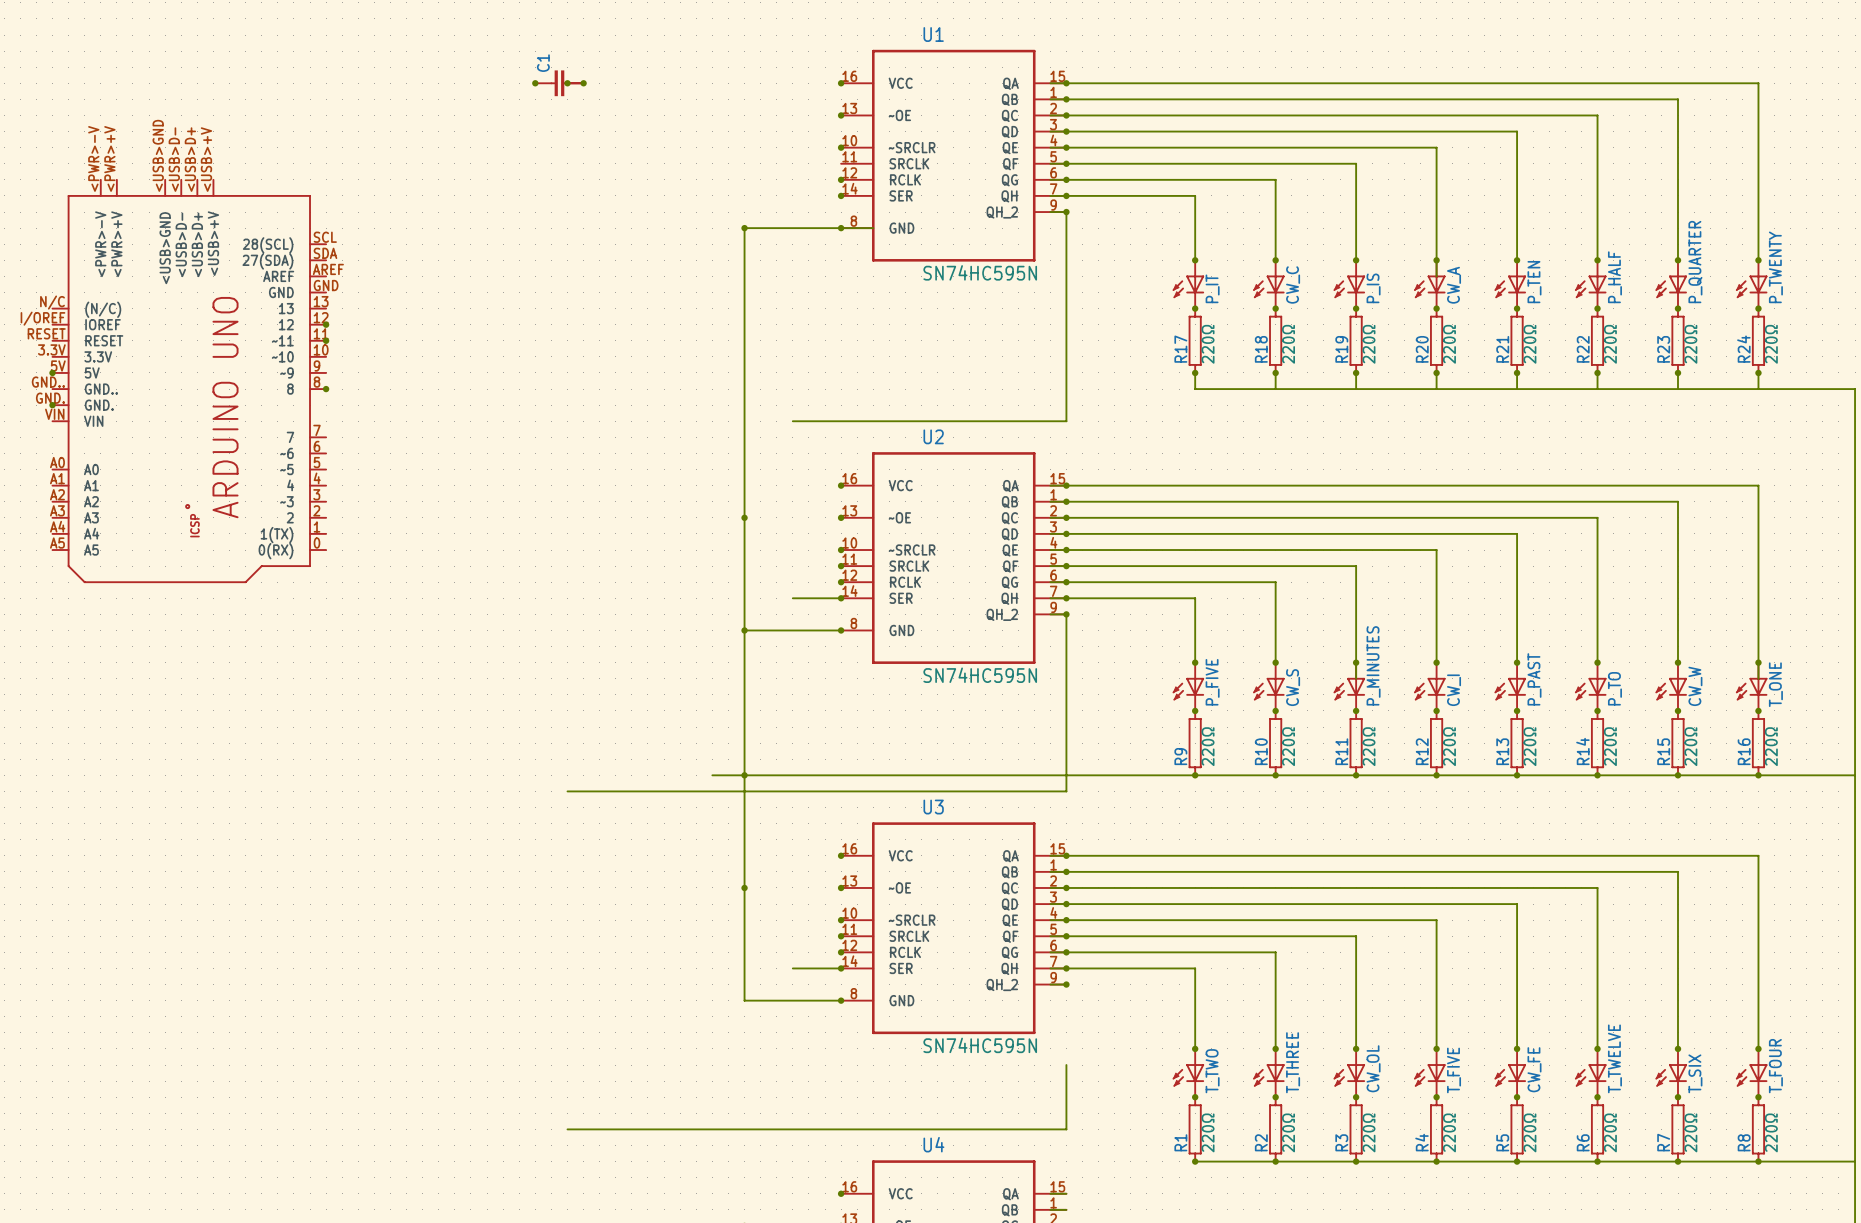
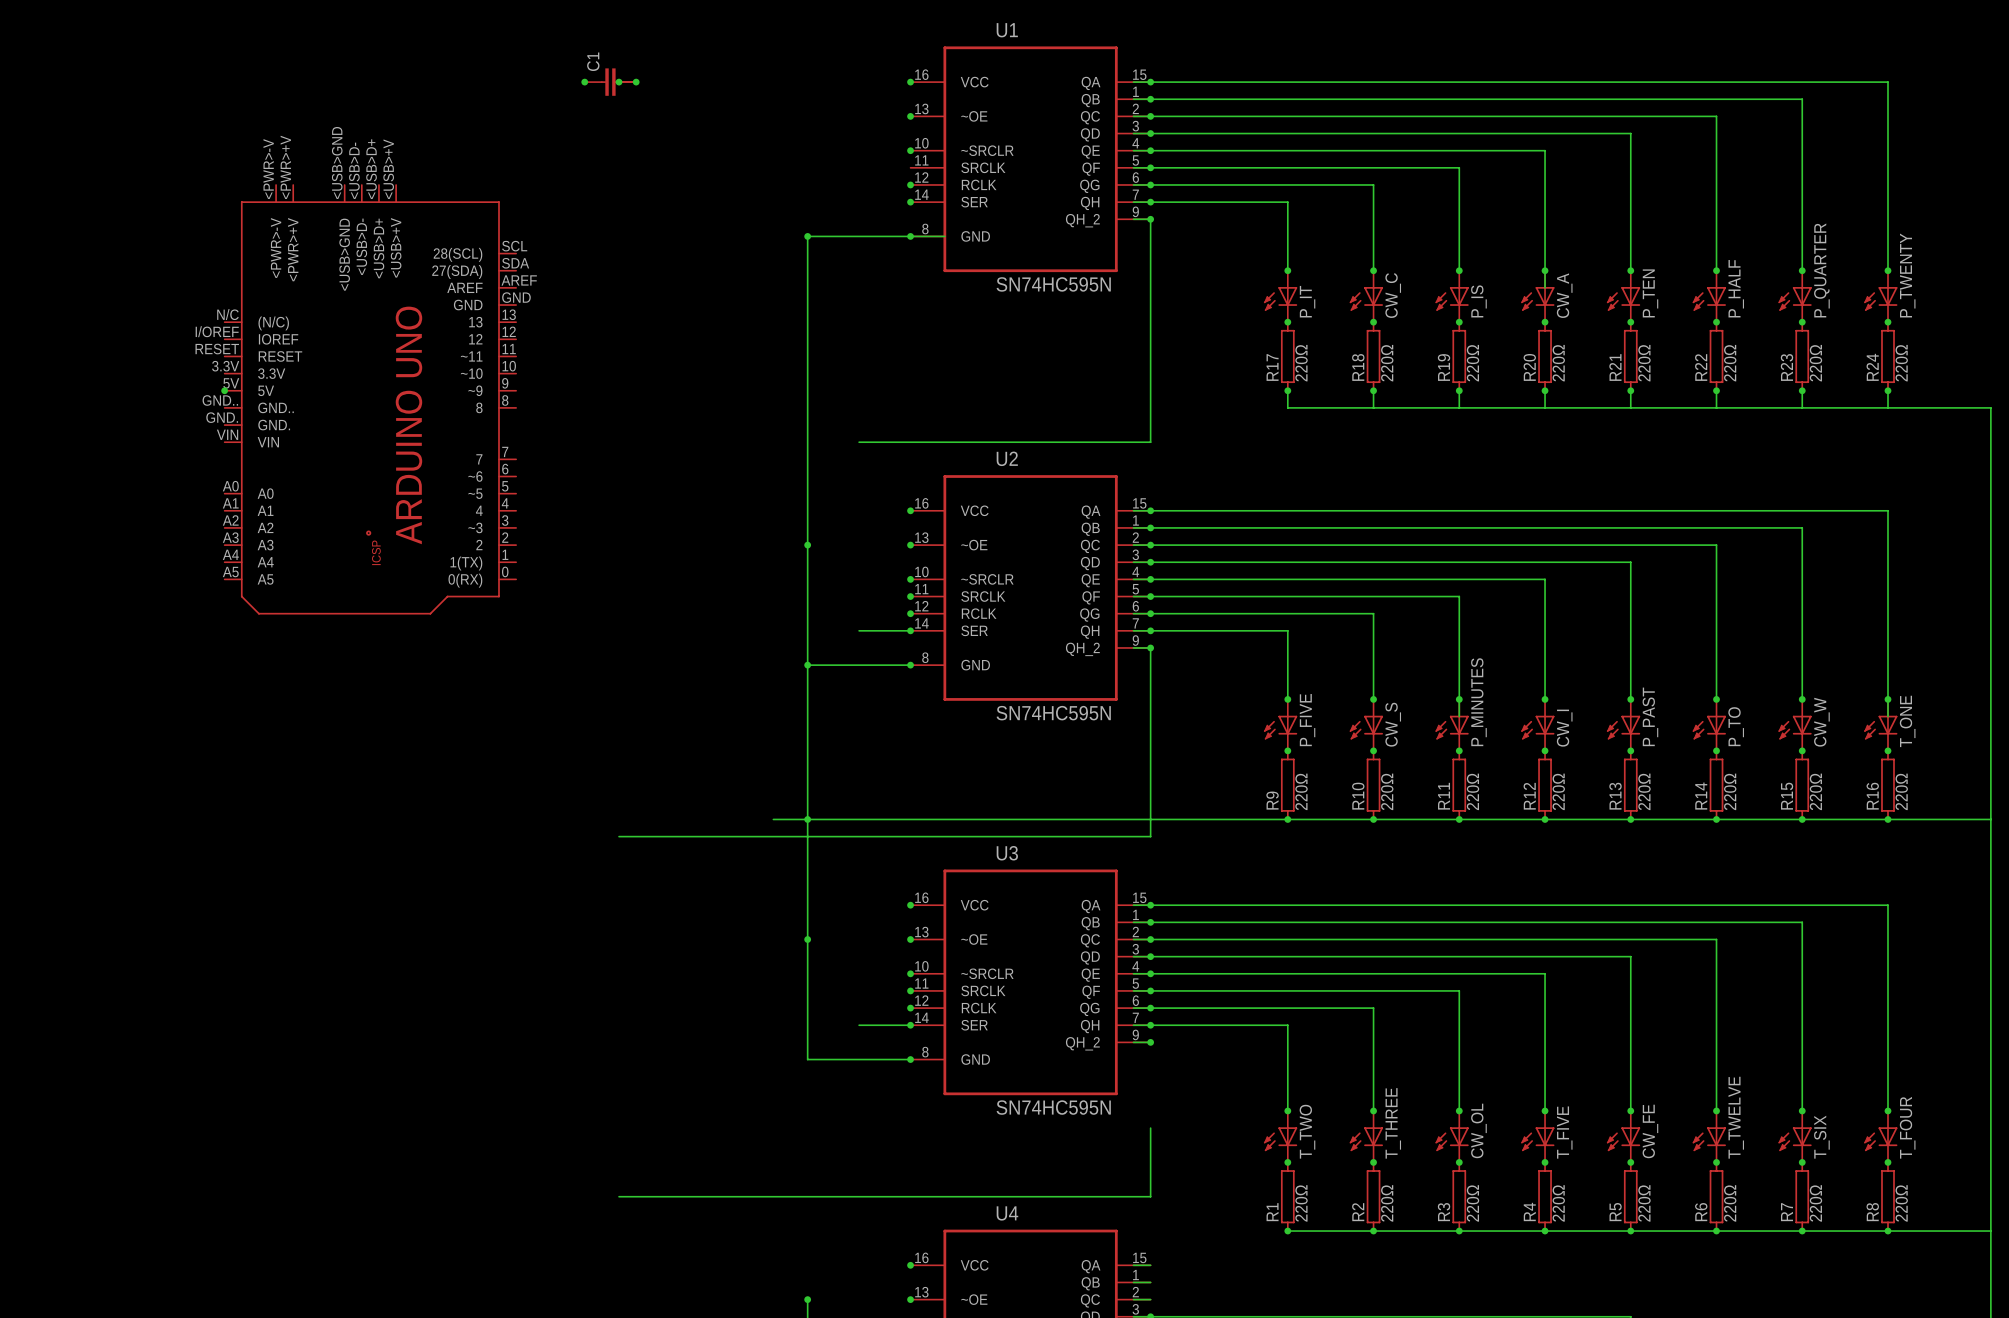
junction: (326, 324) -> none
junction: (326, 340) -> none
junction: (52, 372) -> none
junction: none -> (224, 390)
part position: (189, 381) -> (370, 399)
junction: (326, 389) -> none
junction: (52, 405) -> none

